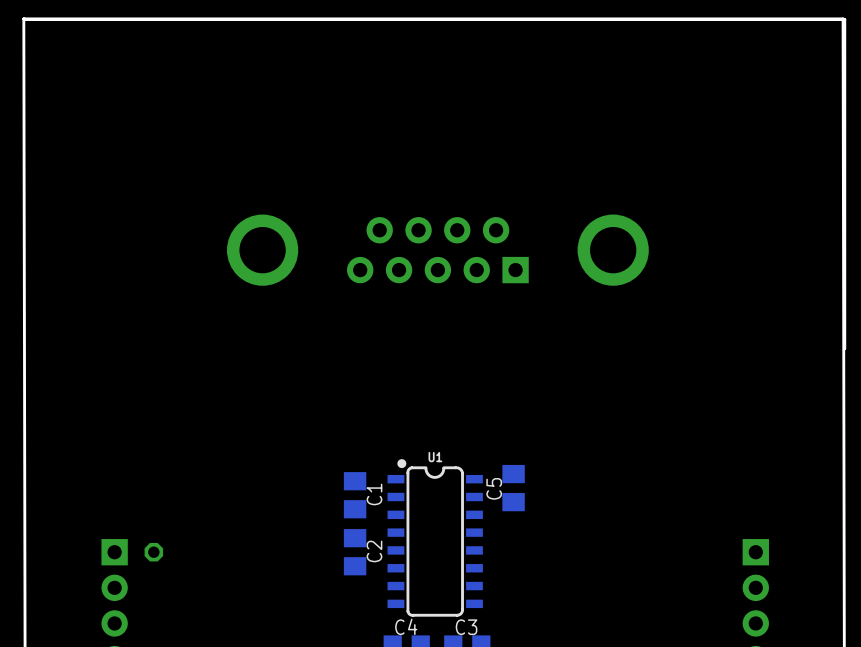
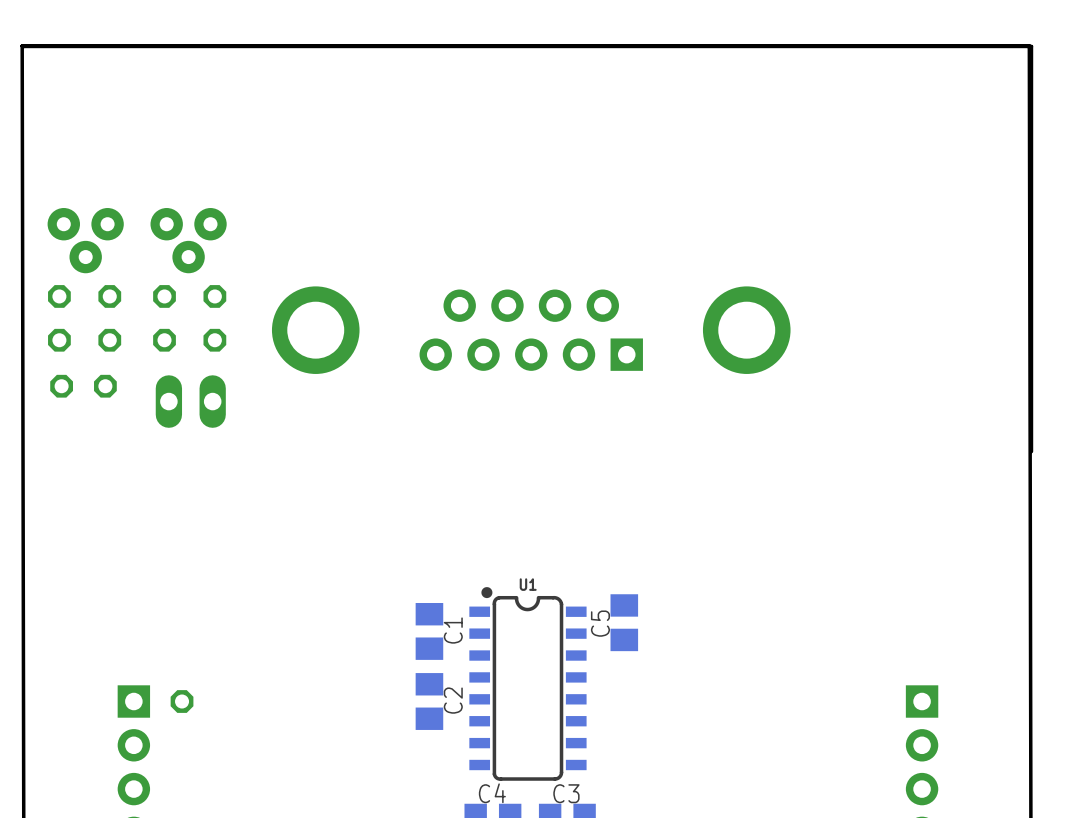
part: none -> (85, 240)
part: none -> (188, 240)
part: none -> (59, 318)
part: none -> (109, 318)
part: none -> (164, 318)
part: none -> (214, 318)
part: none -> (83, 386)
part: none -> (190, 401)

